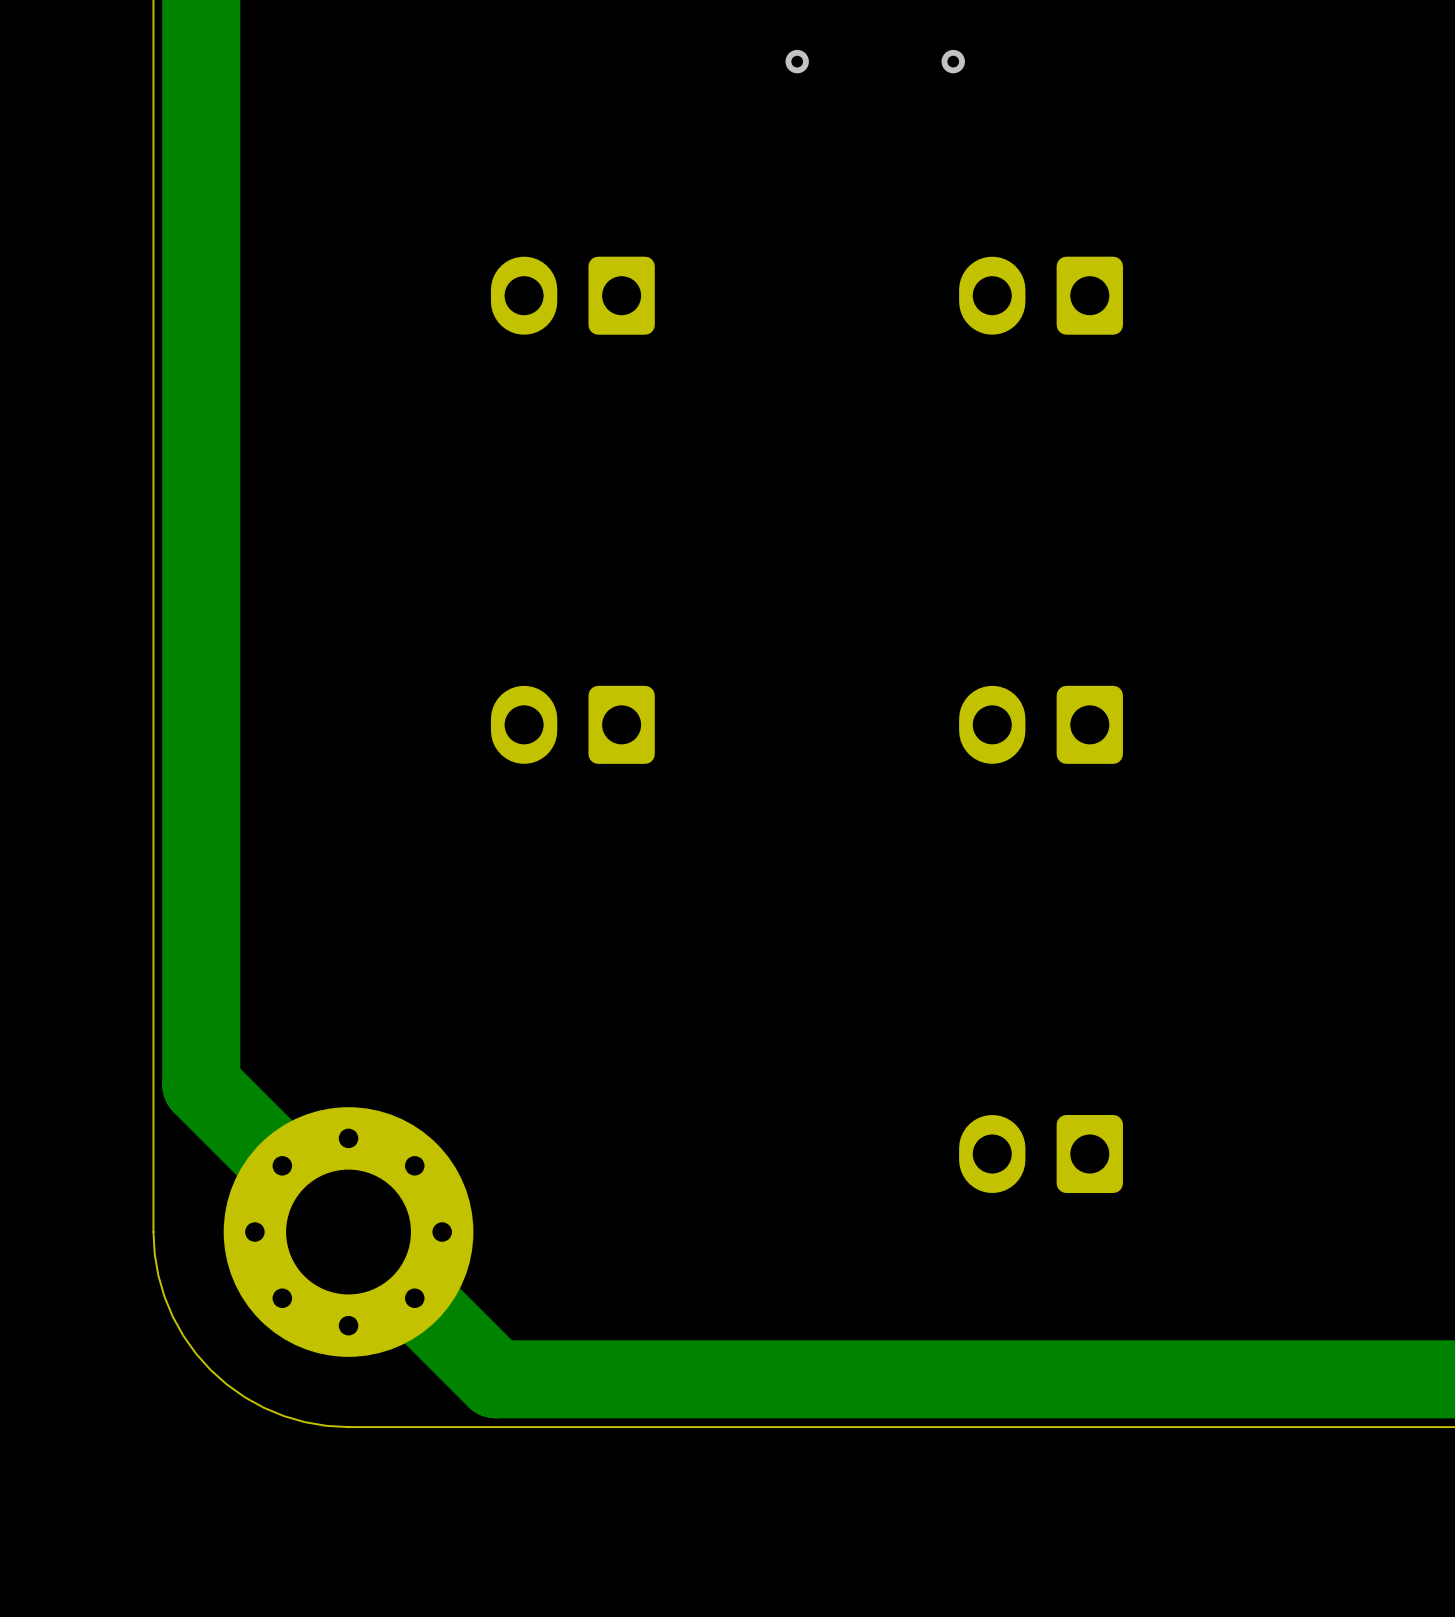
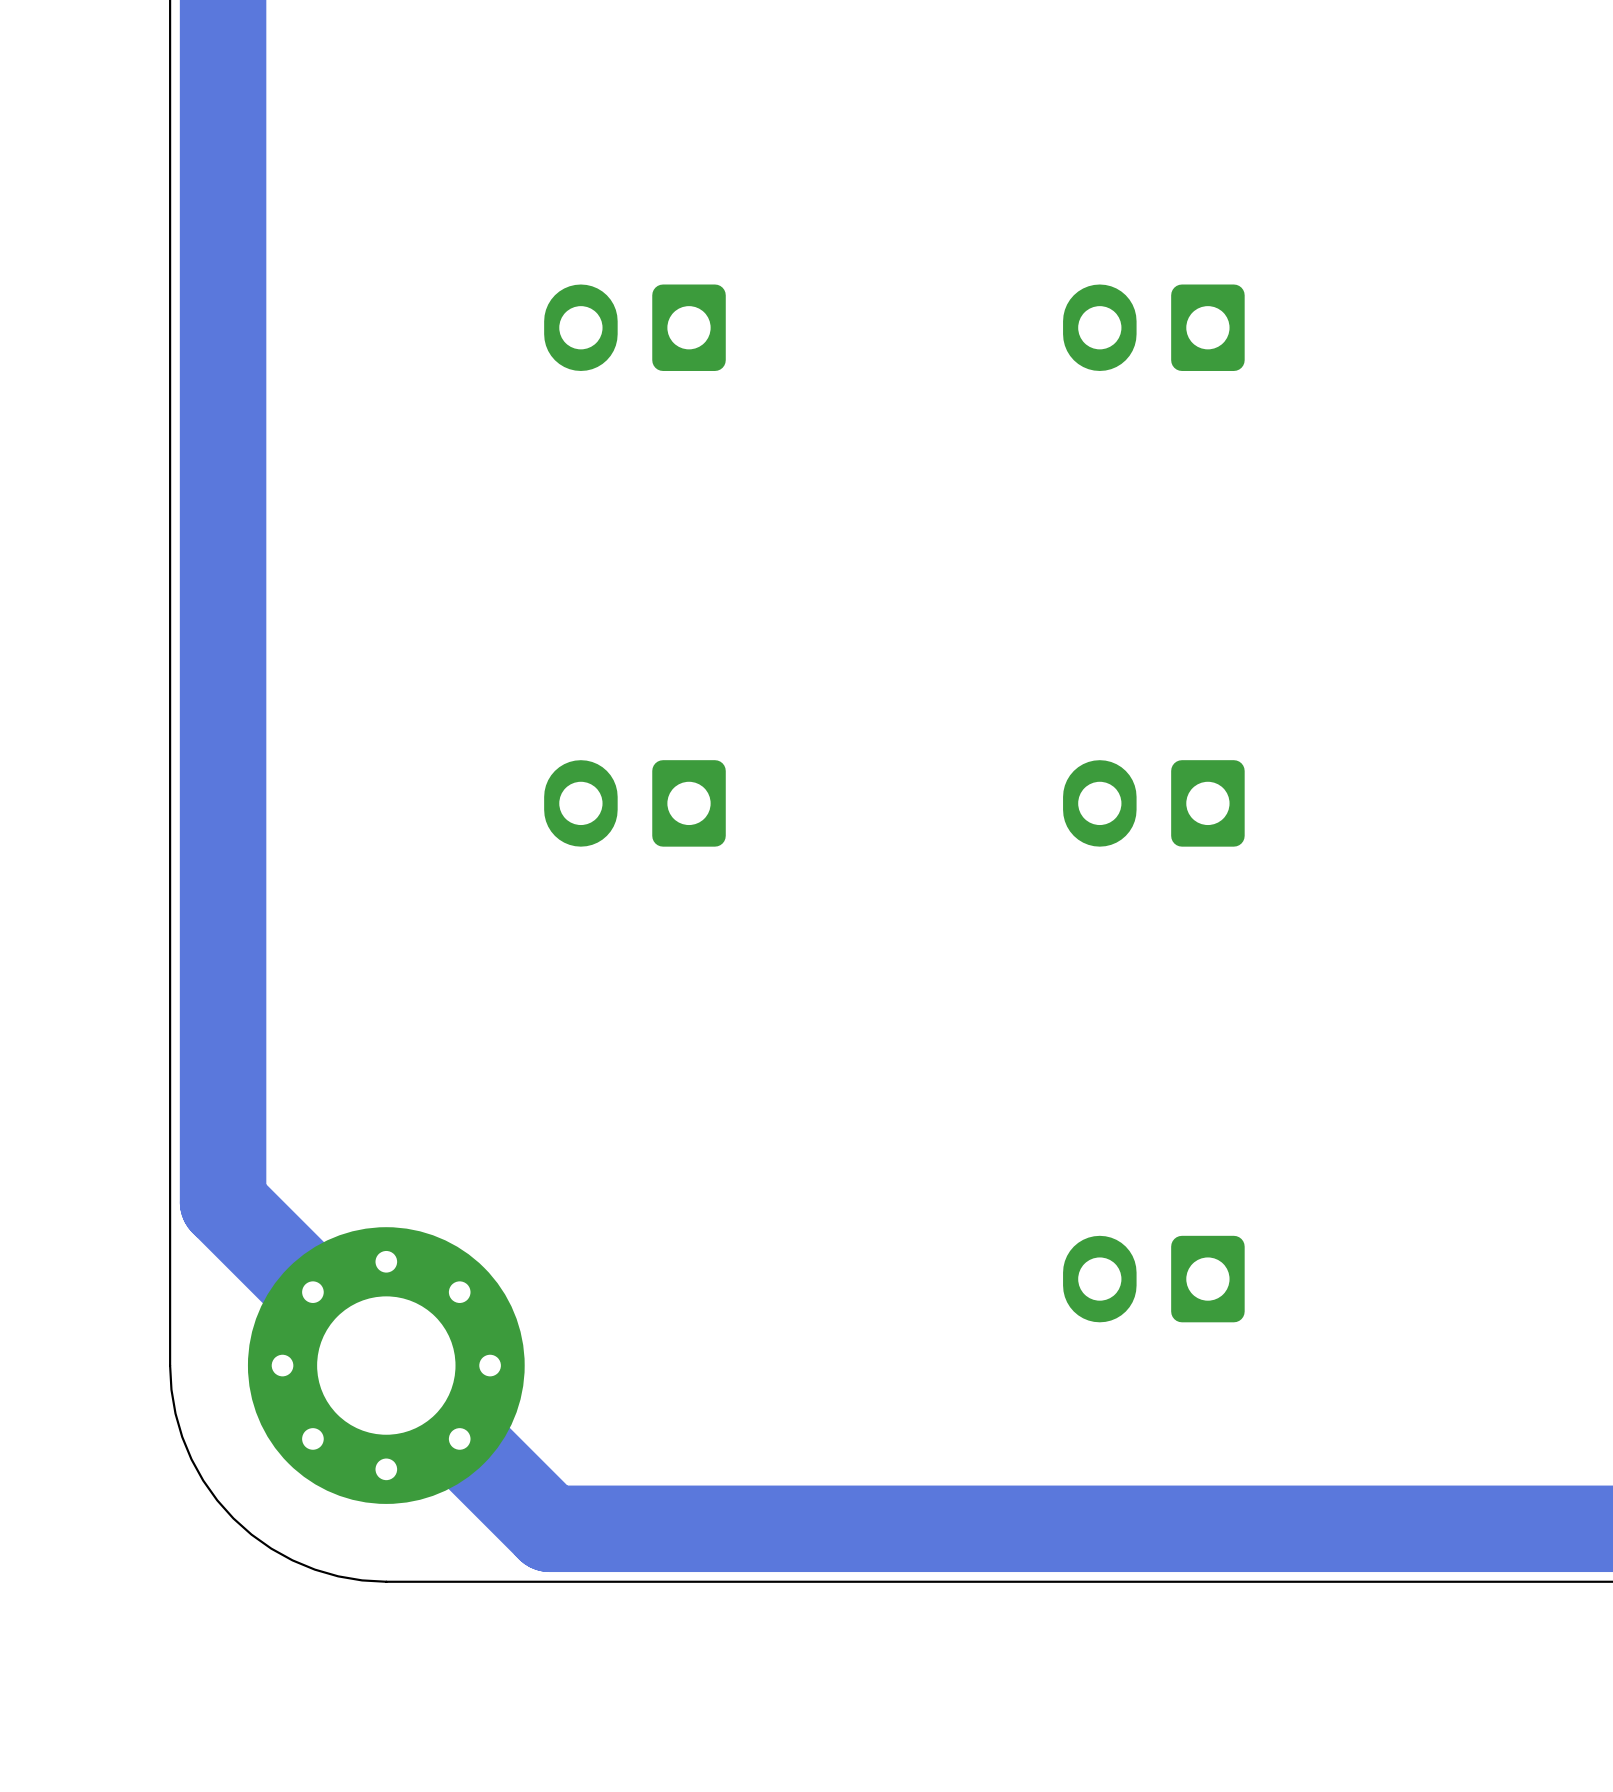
via: (797, 61) -> none
via: (953, 61) -> none

